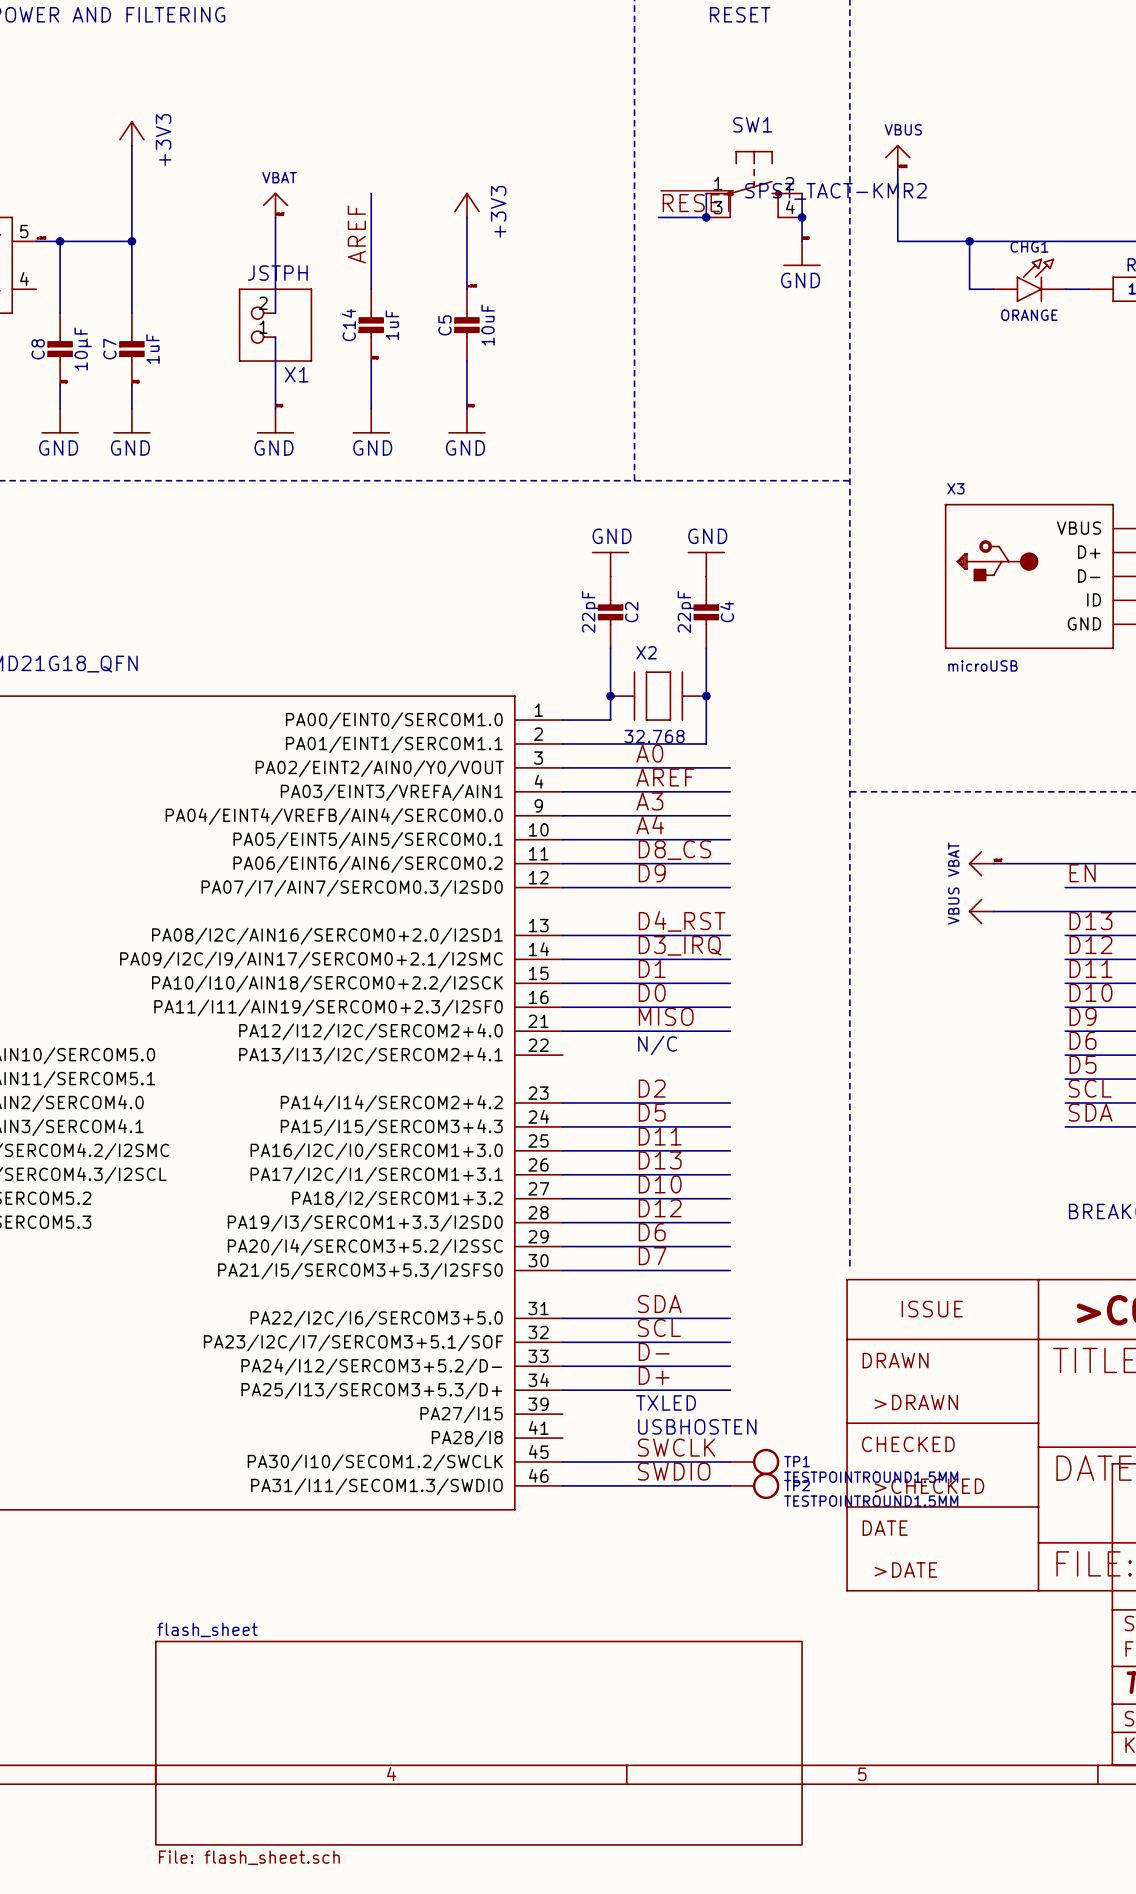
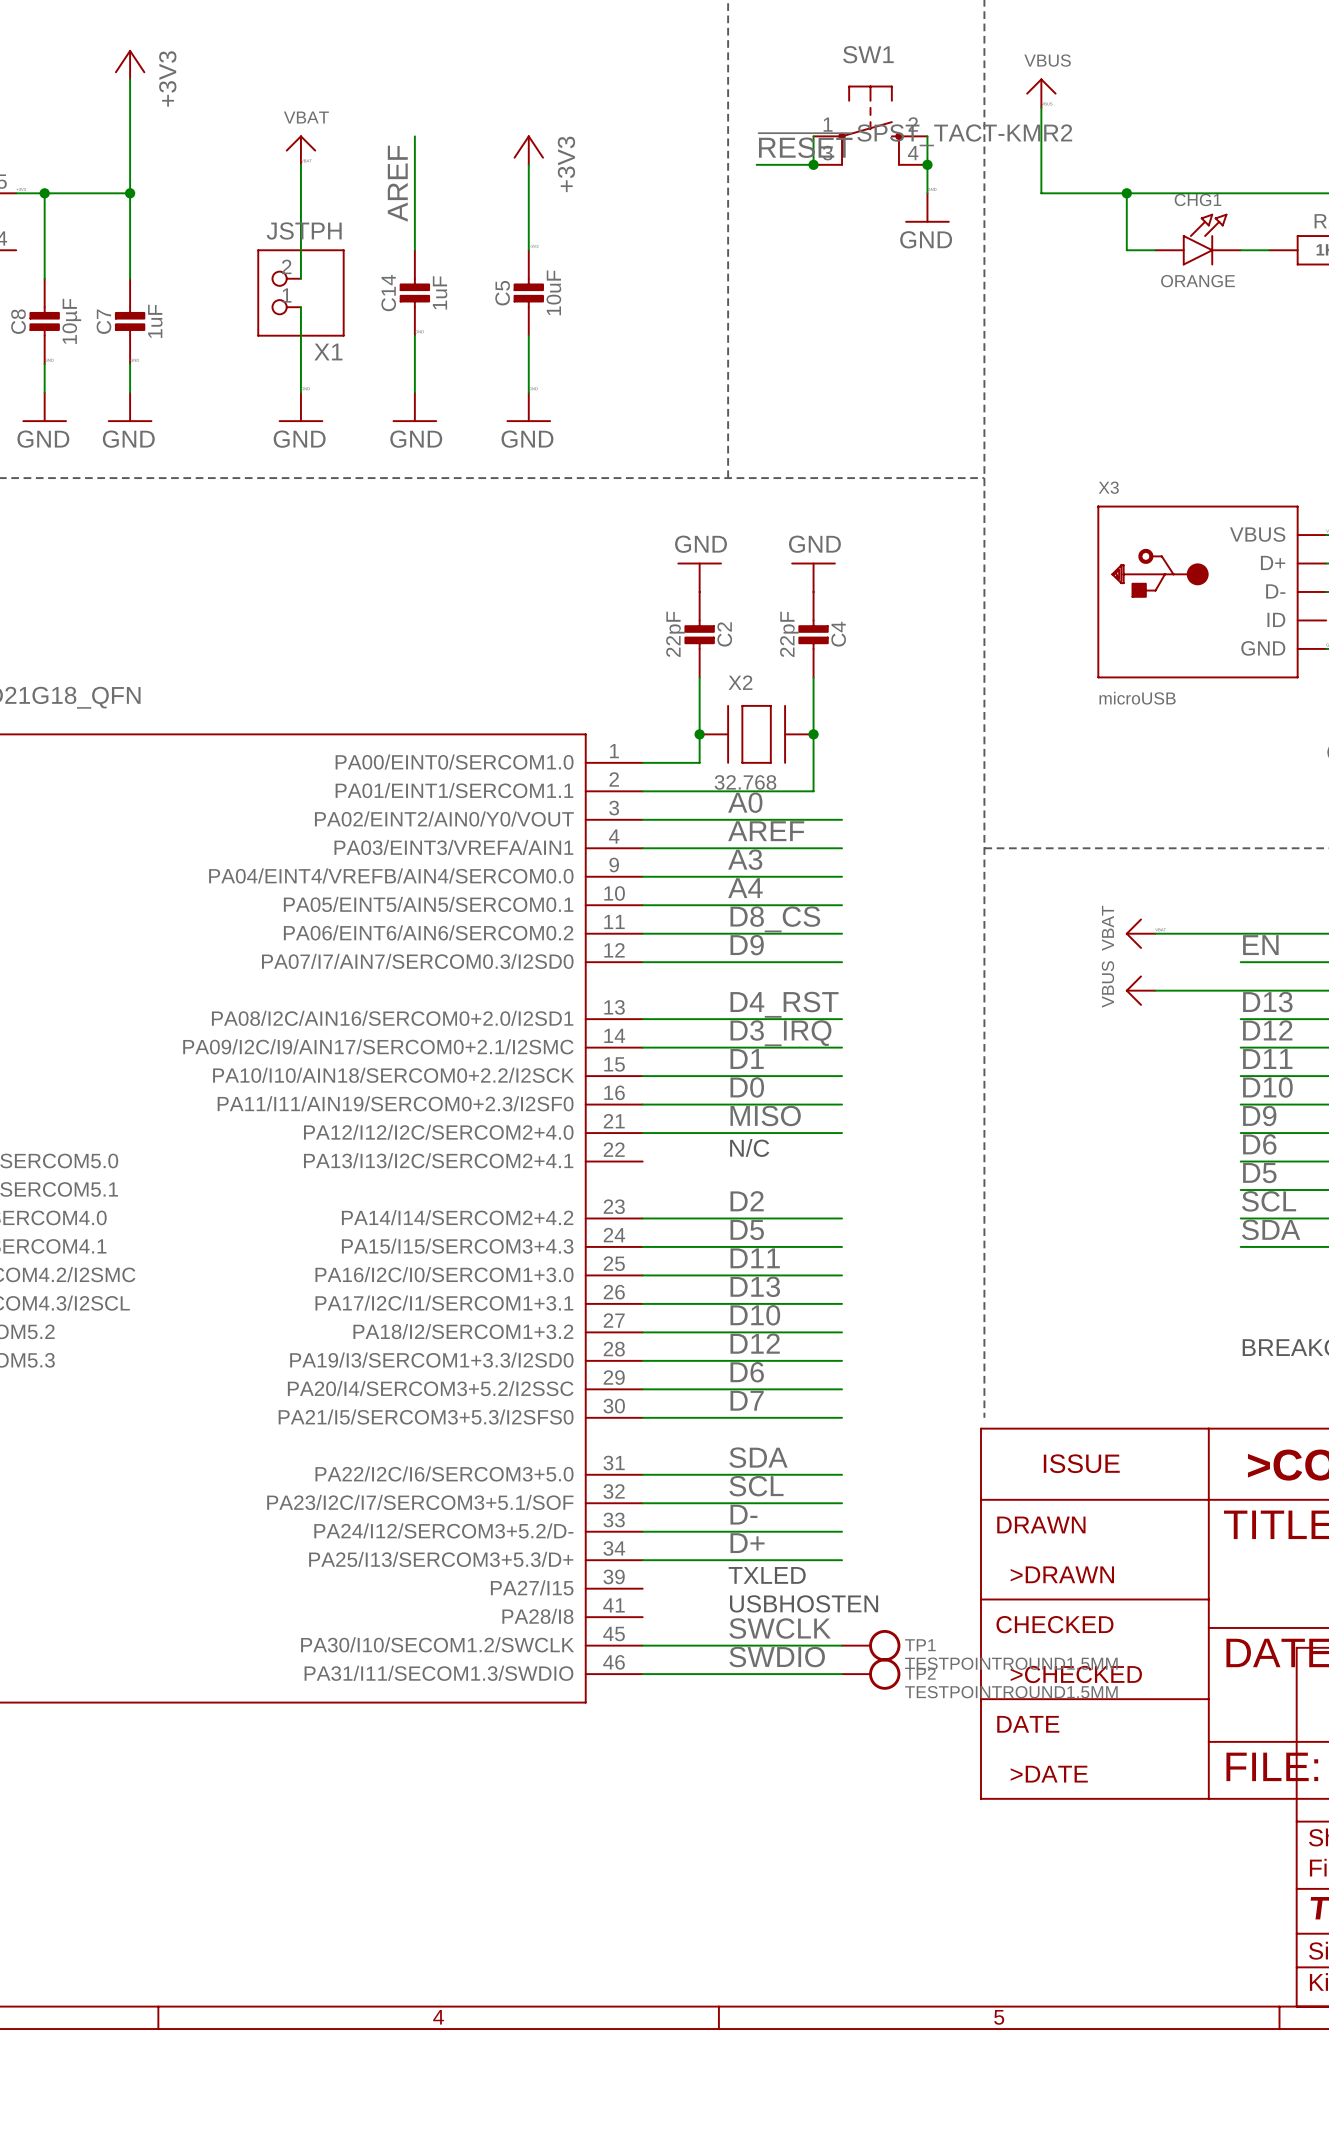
sheet flash_sheet: File: flash_sheet.sch (478, 1743) -> none

